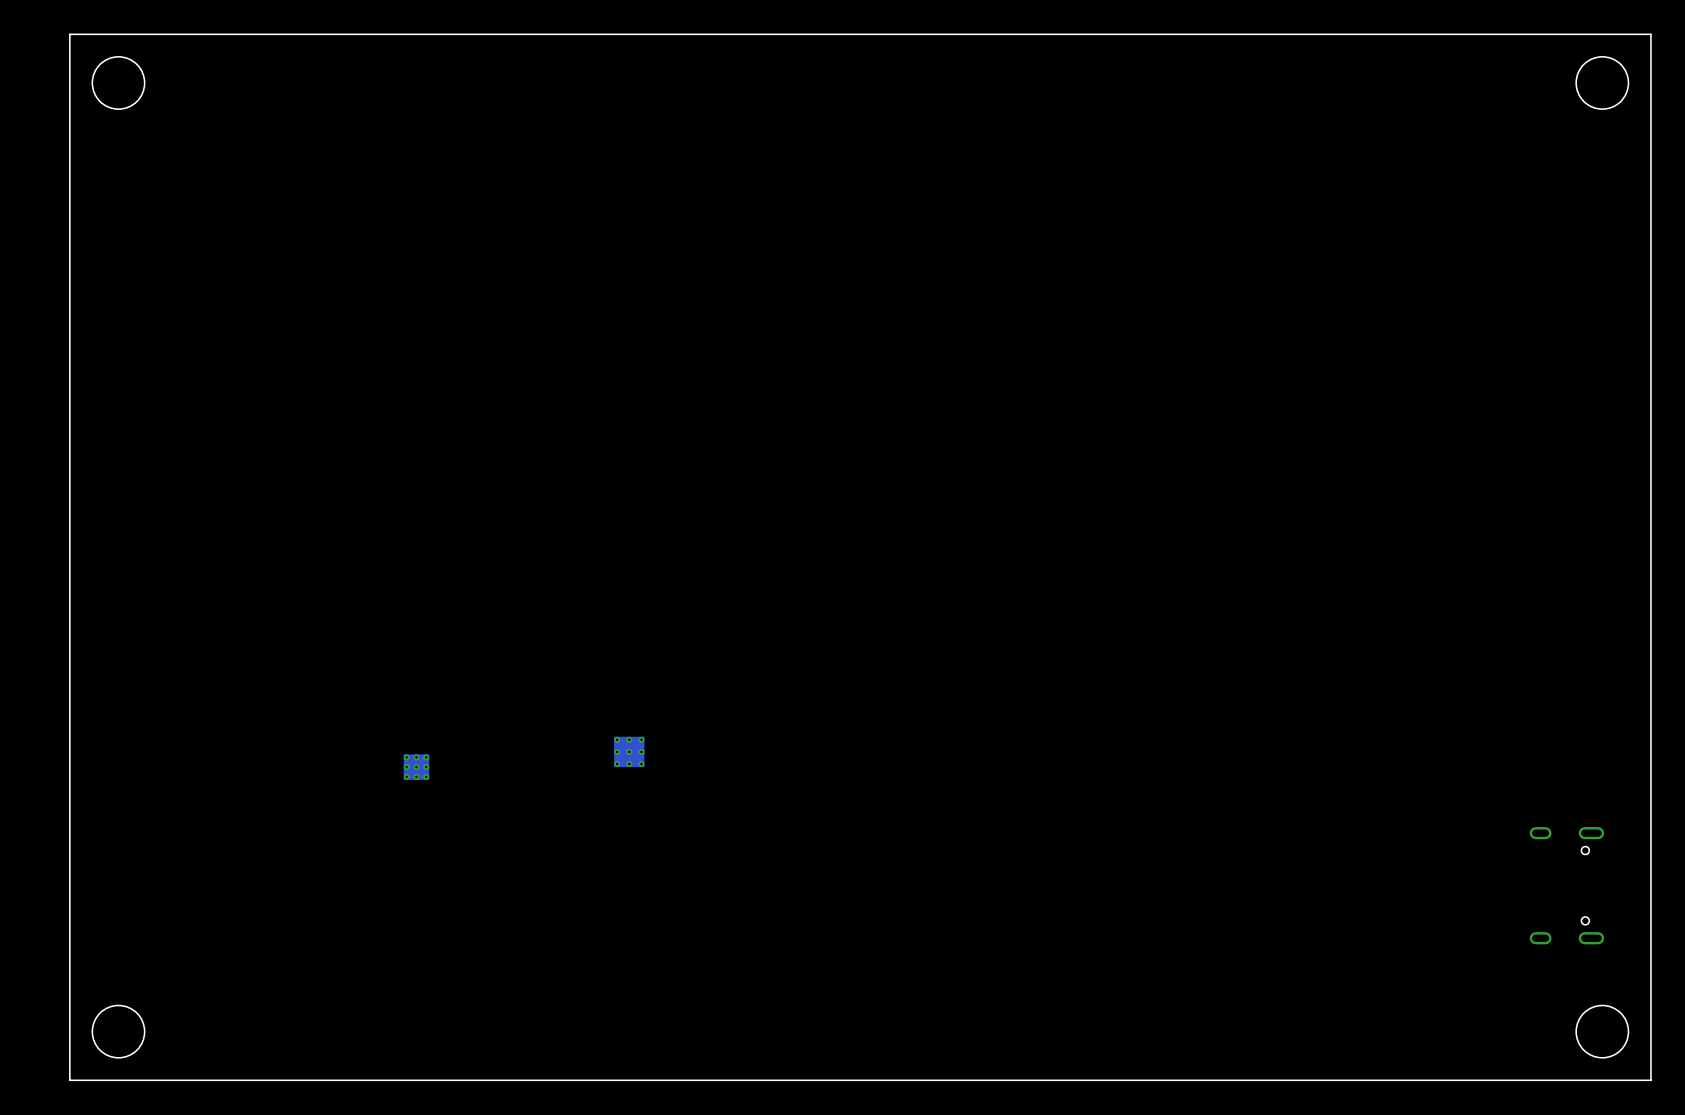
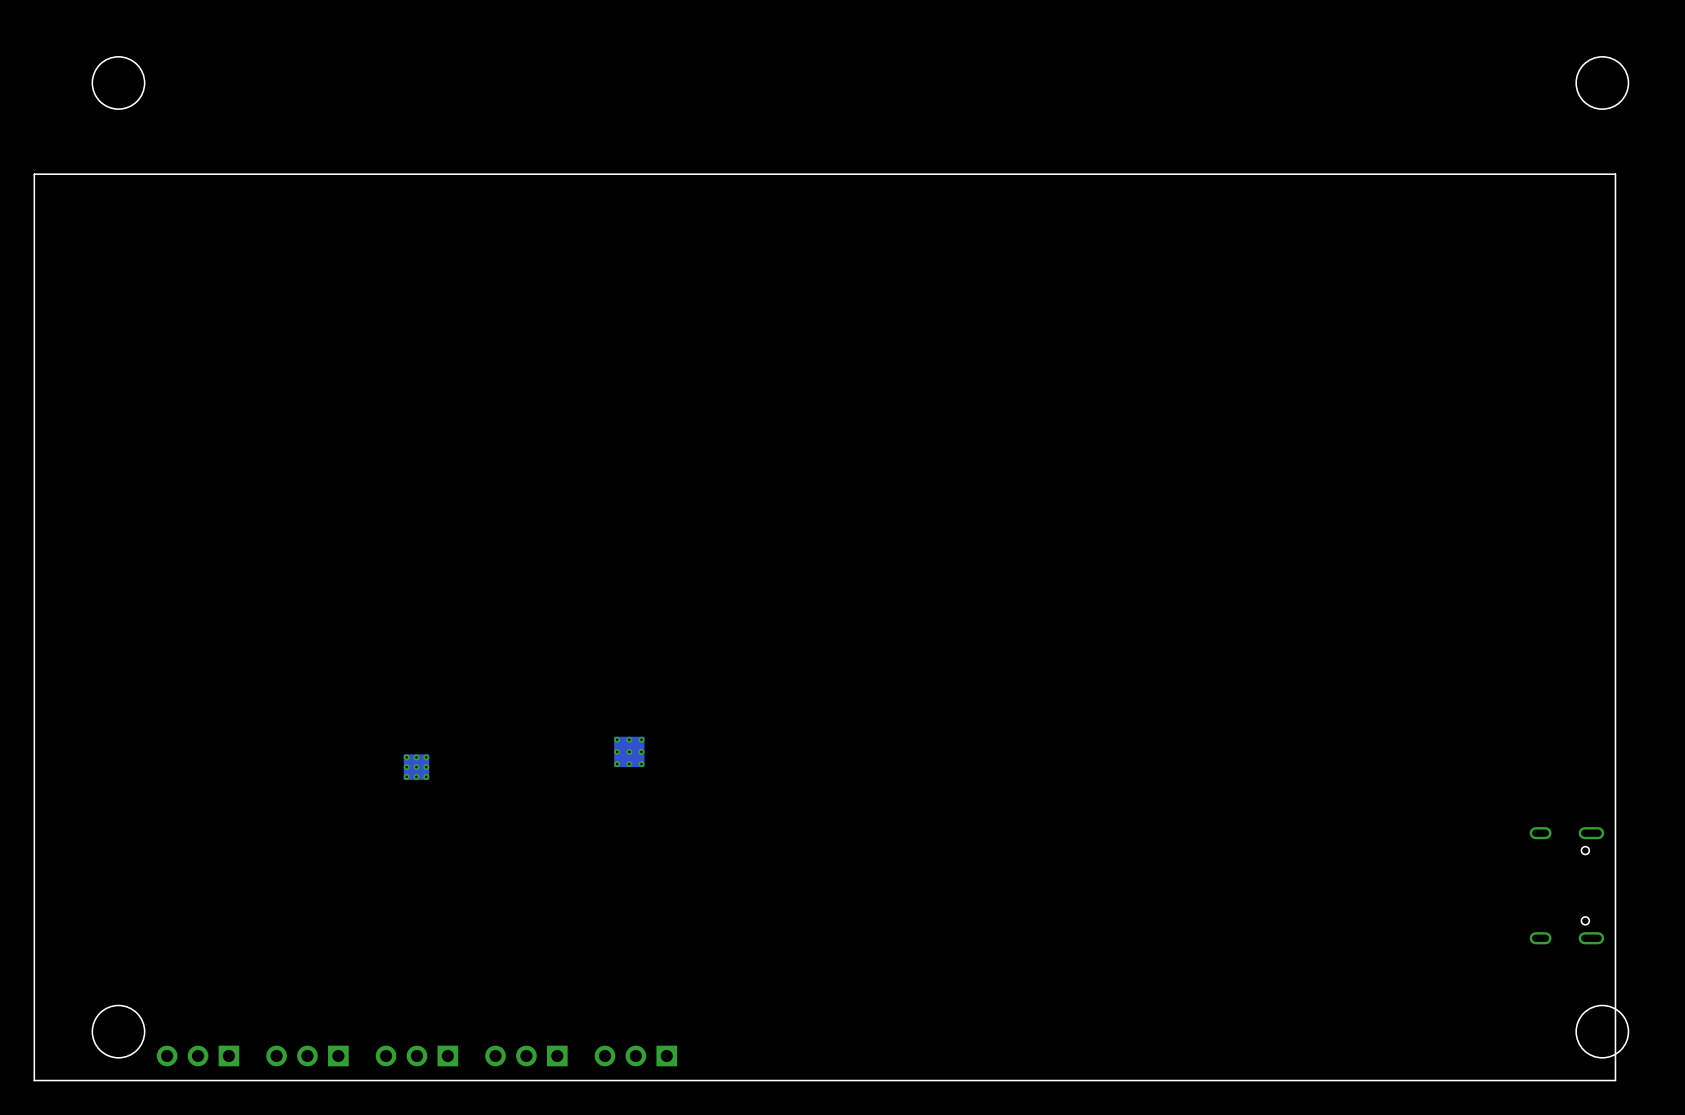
board edge: (1650, 34) (1650, 1080) (69, 1080) (69, 34) (1650, 34) -> (1615, 174) (1615, 1080) (34, 1080) (34, 174) (1615, 174)
part: none -> (198, 1055)
part: none -> (307, 1055)
part: none -> (416, 1055)
part: none -> (526, 1055)
part: none -> (635, 1055)

